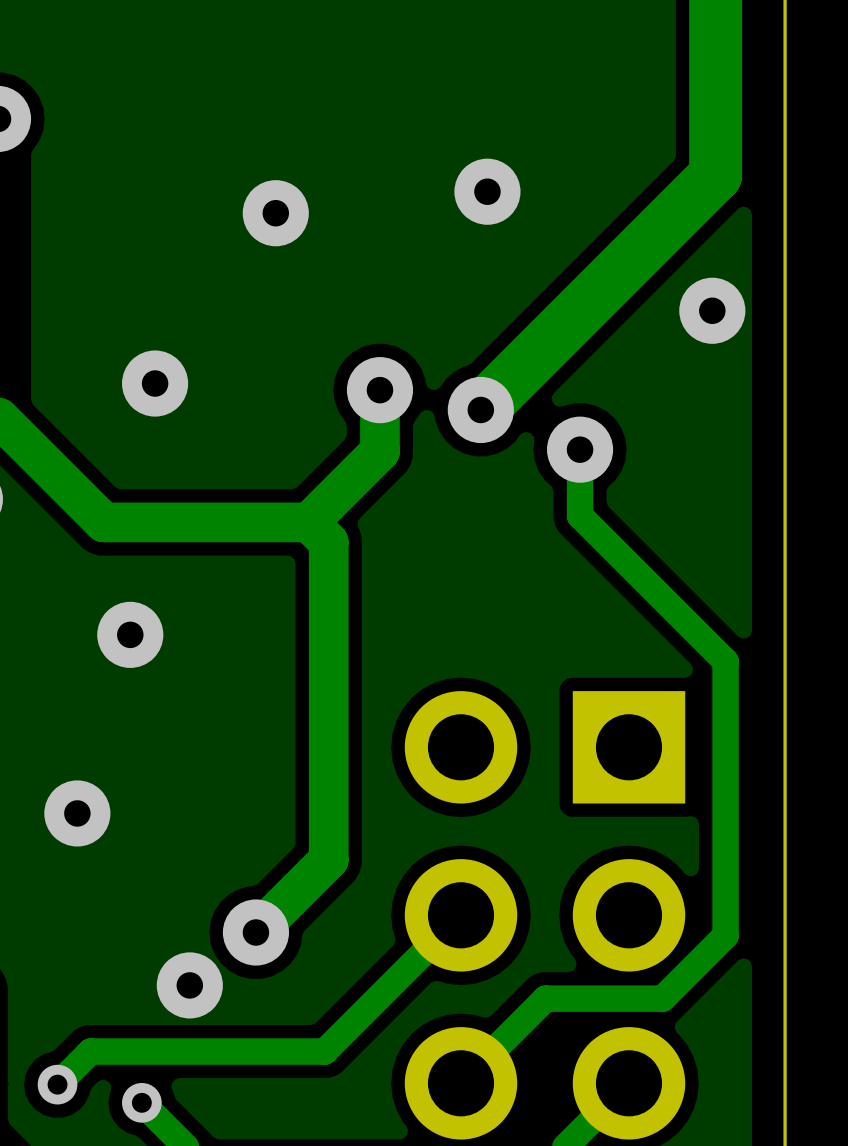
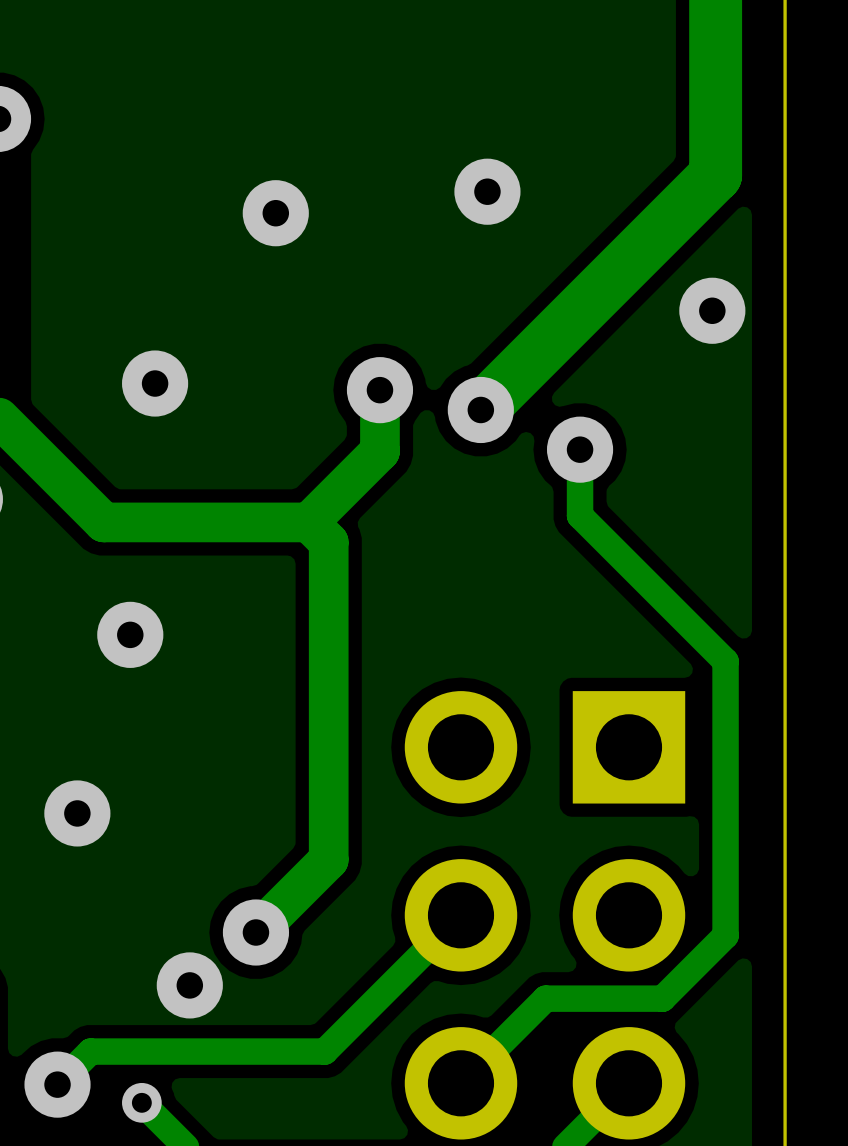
via size: [37, 1064, 78, 1105] -> [24, 1051, 91, 1118]

